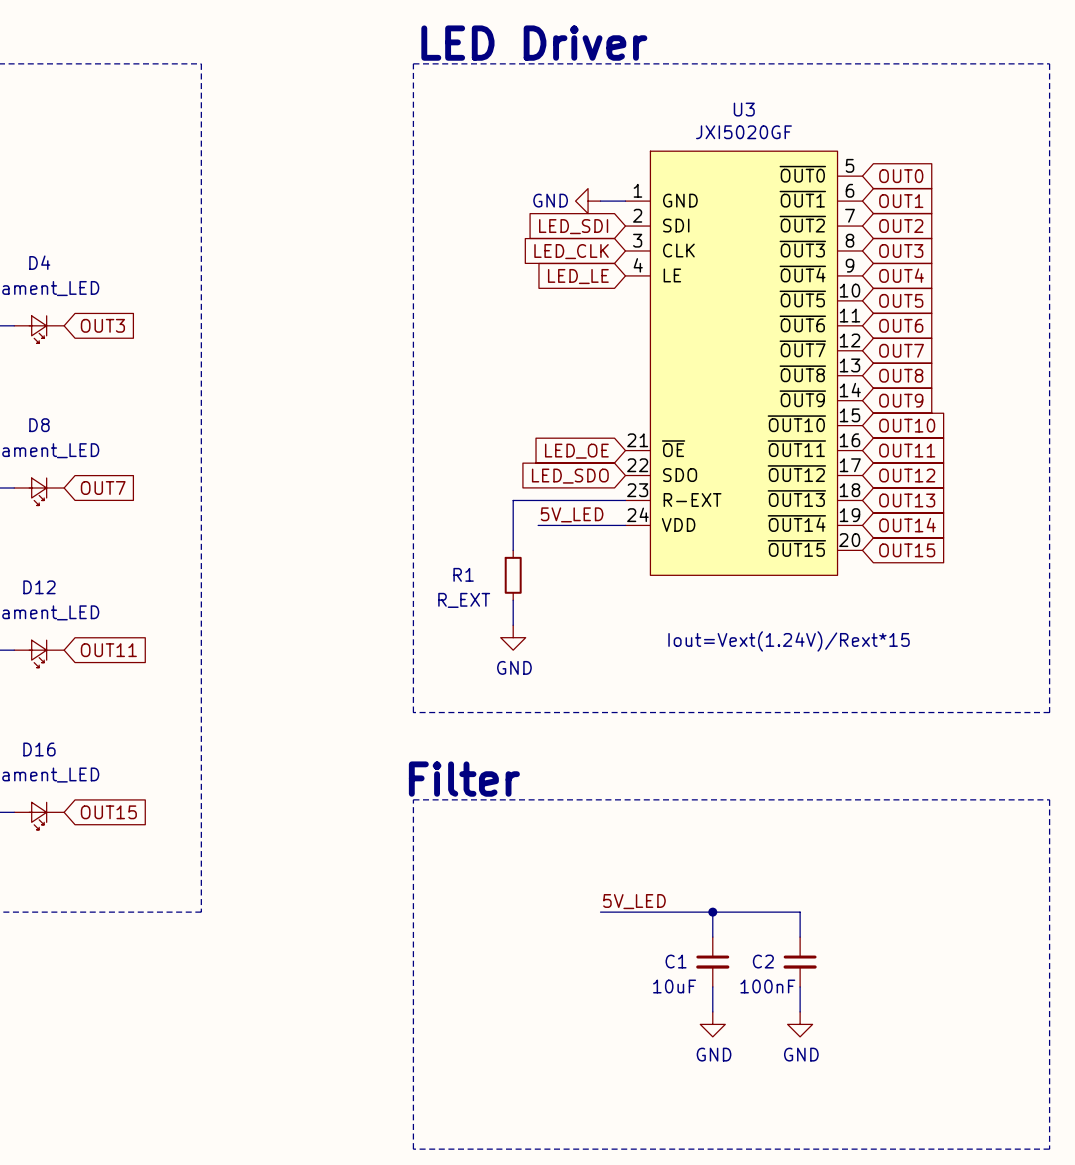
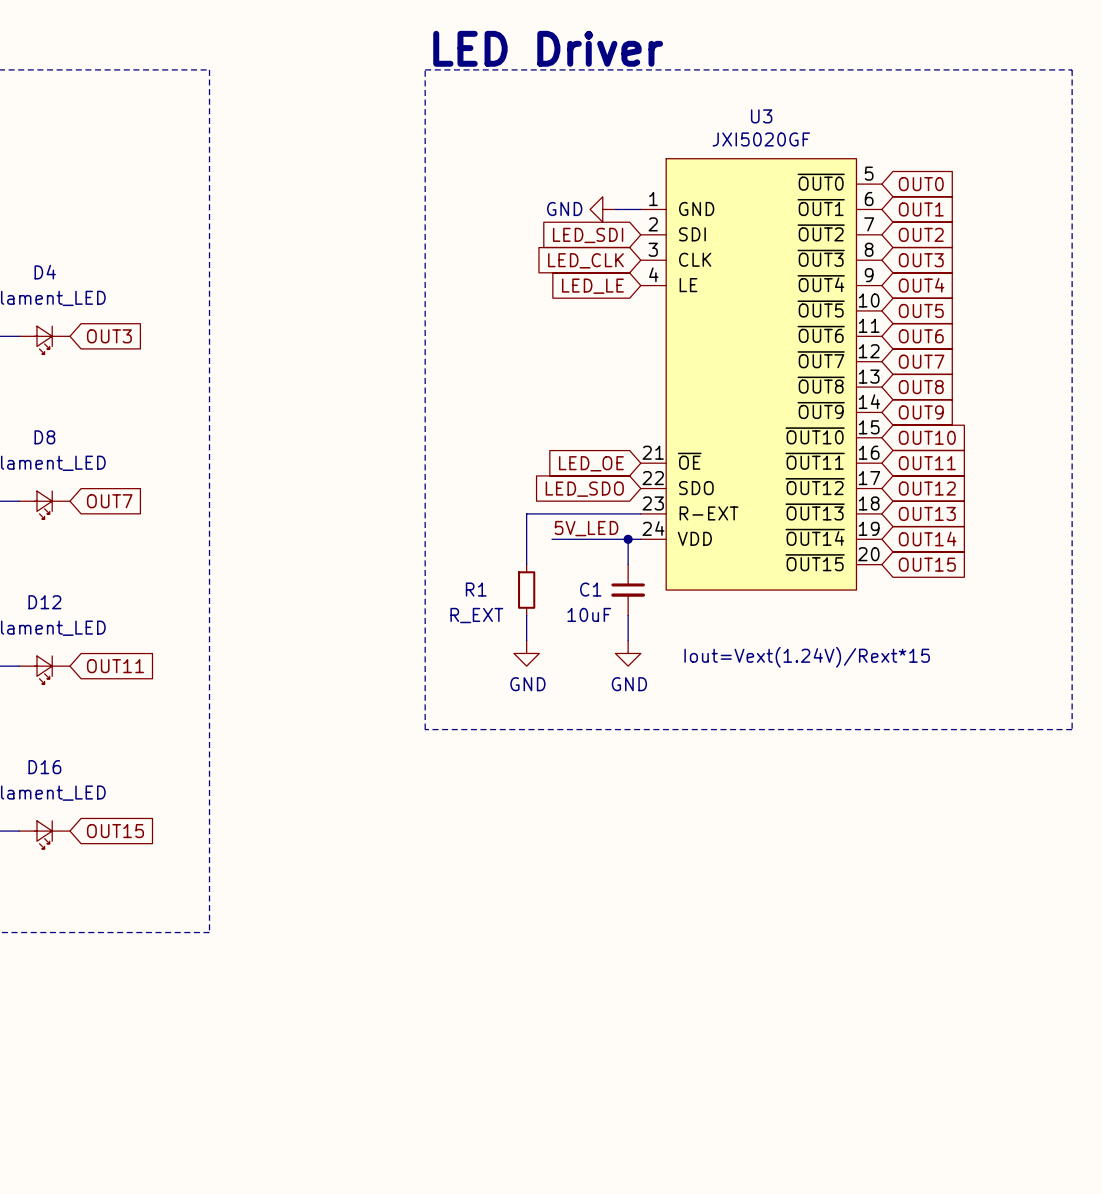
wire: none -> (628, 539) (628, 564)
junction: none -> (628, 539)
wire: none -> (628, 615) (628, 640)
power symbol: none -> GND (628, 653)
text: Filter (464, 779) -> none
line: (413, 799) (1049, 799) (1049, 1149) (413, 1149) (413, 799) -> none
label: 5V_LED (634, 901) -> none
wire: (600, 912) (800, 912) (800, 937) -> none
wire: (712, 912) (712, 937) -> none
junction: (712, 912) -> none
C1 position: (712, 962) -> (628, 590)
C2: 100nF (800, 962) -> none
wire: (712, 986) (712, 1011) -> none
wire: (800, 986) (800, 1011) -> none
power symbol: GND (712, 1024) -> none
power symbol: GND (800, 1024) -> none

